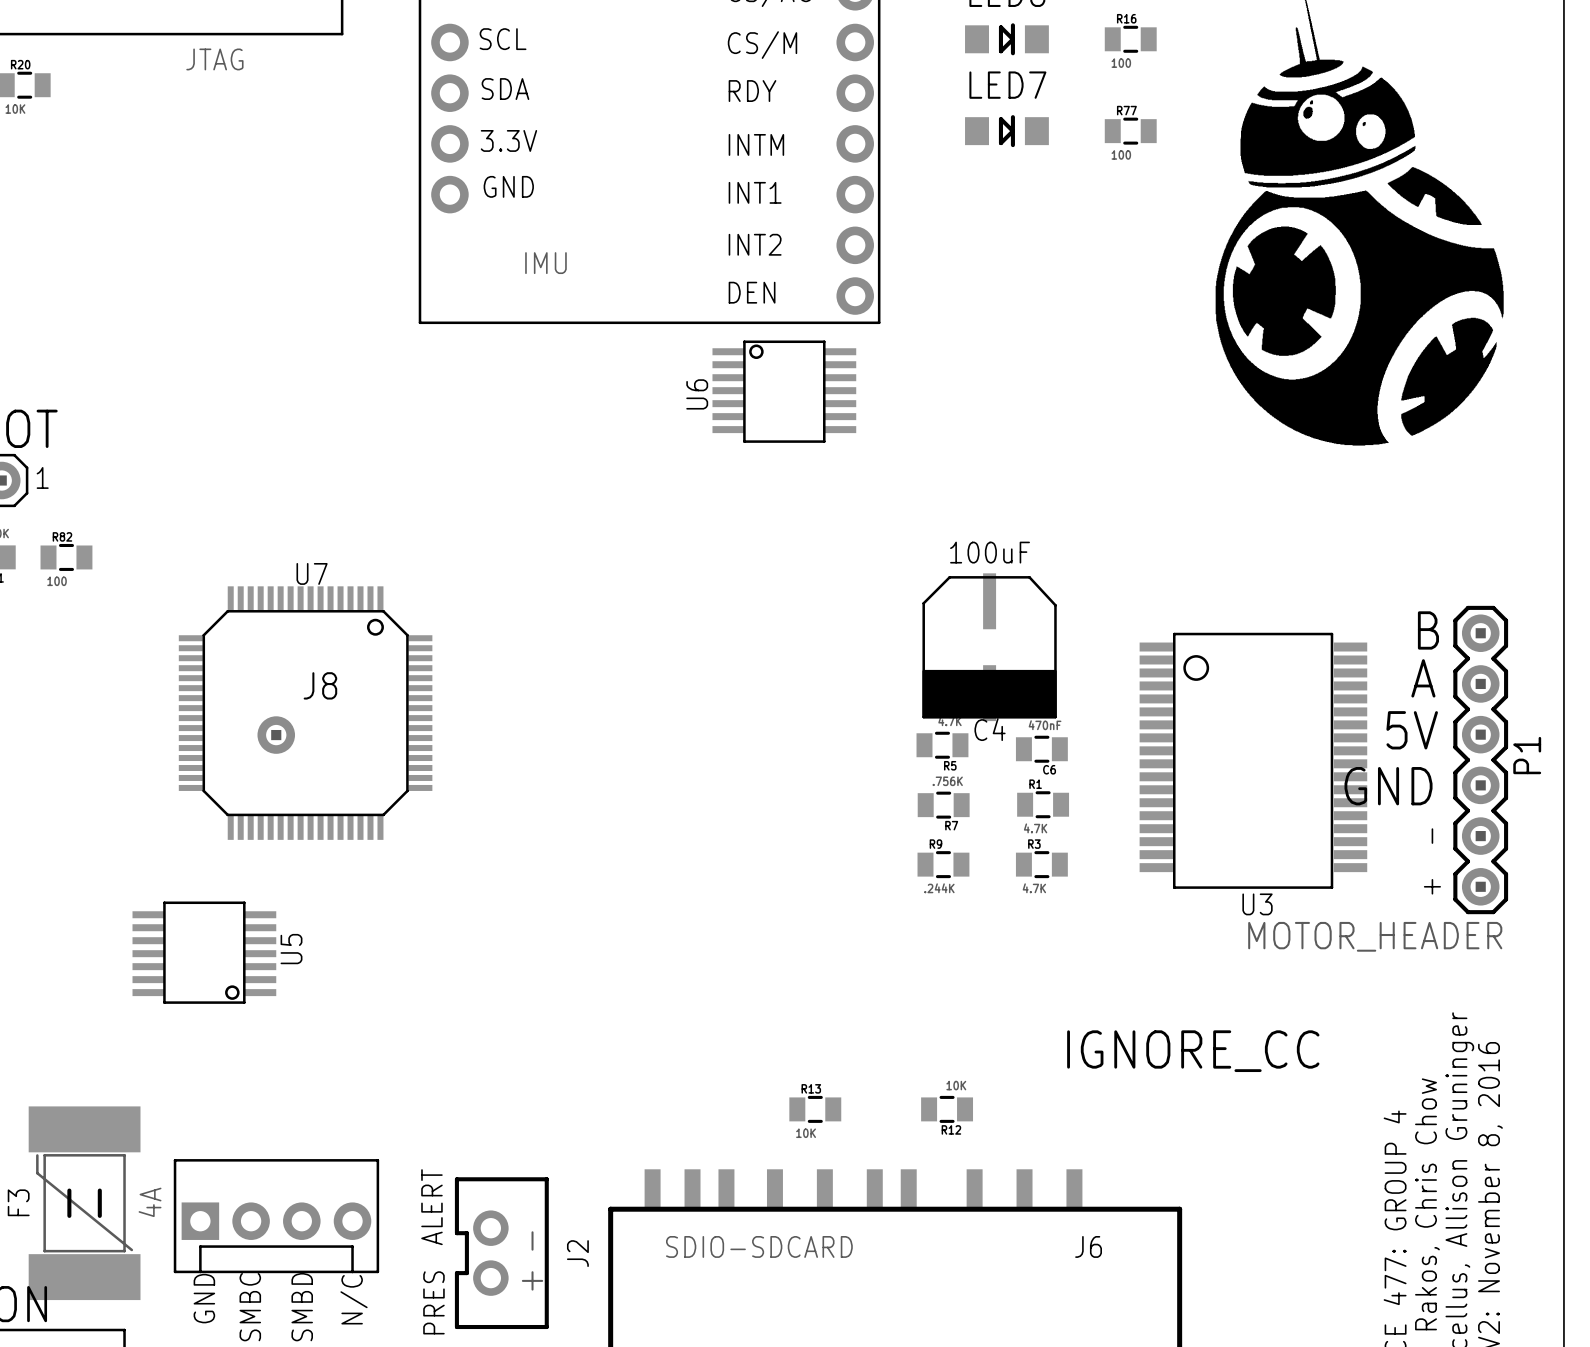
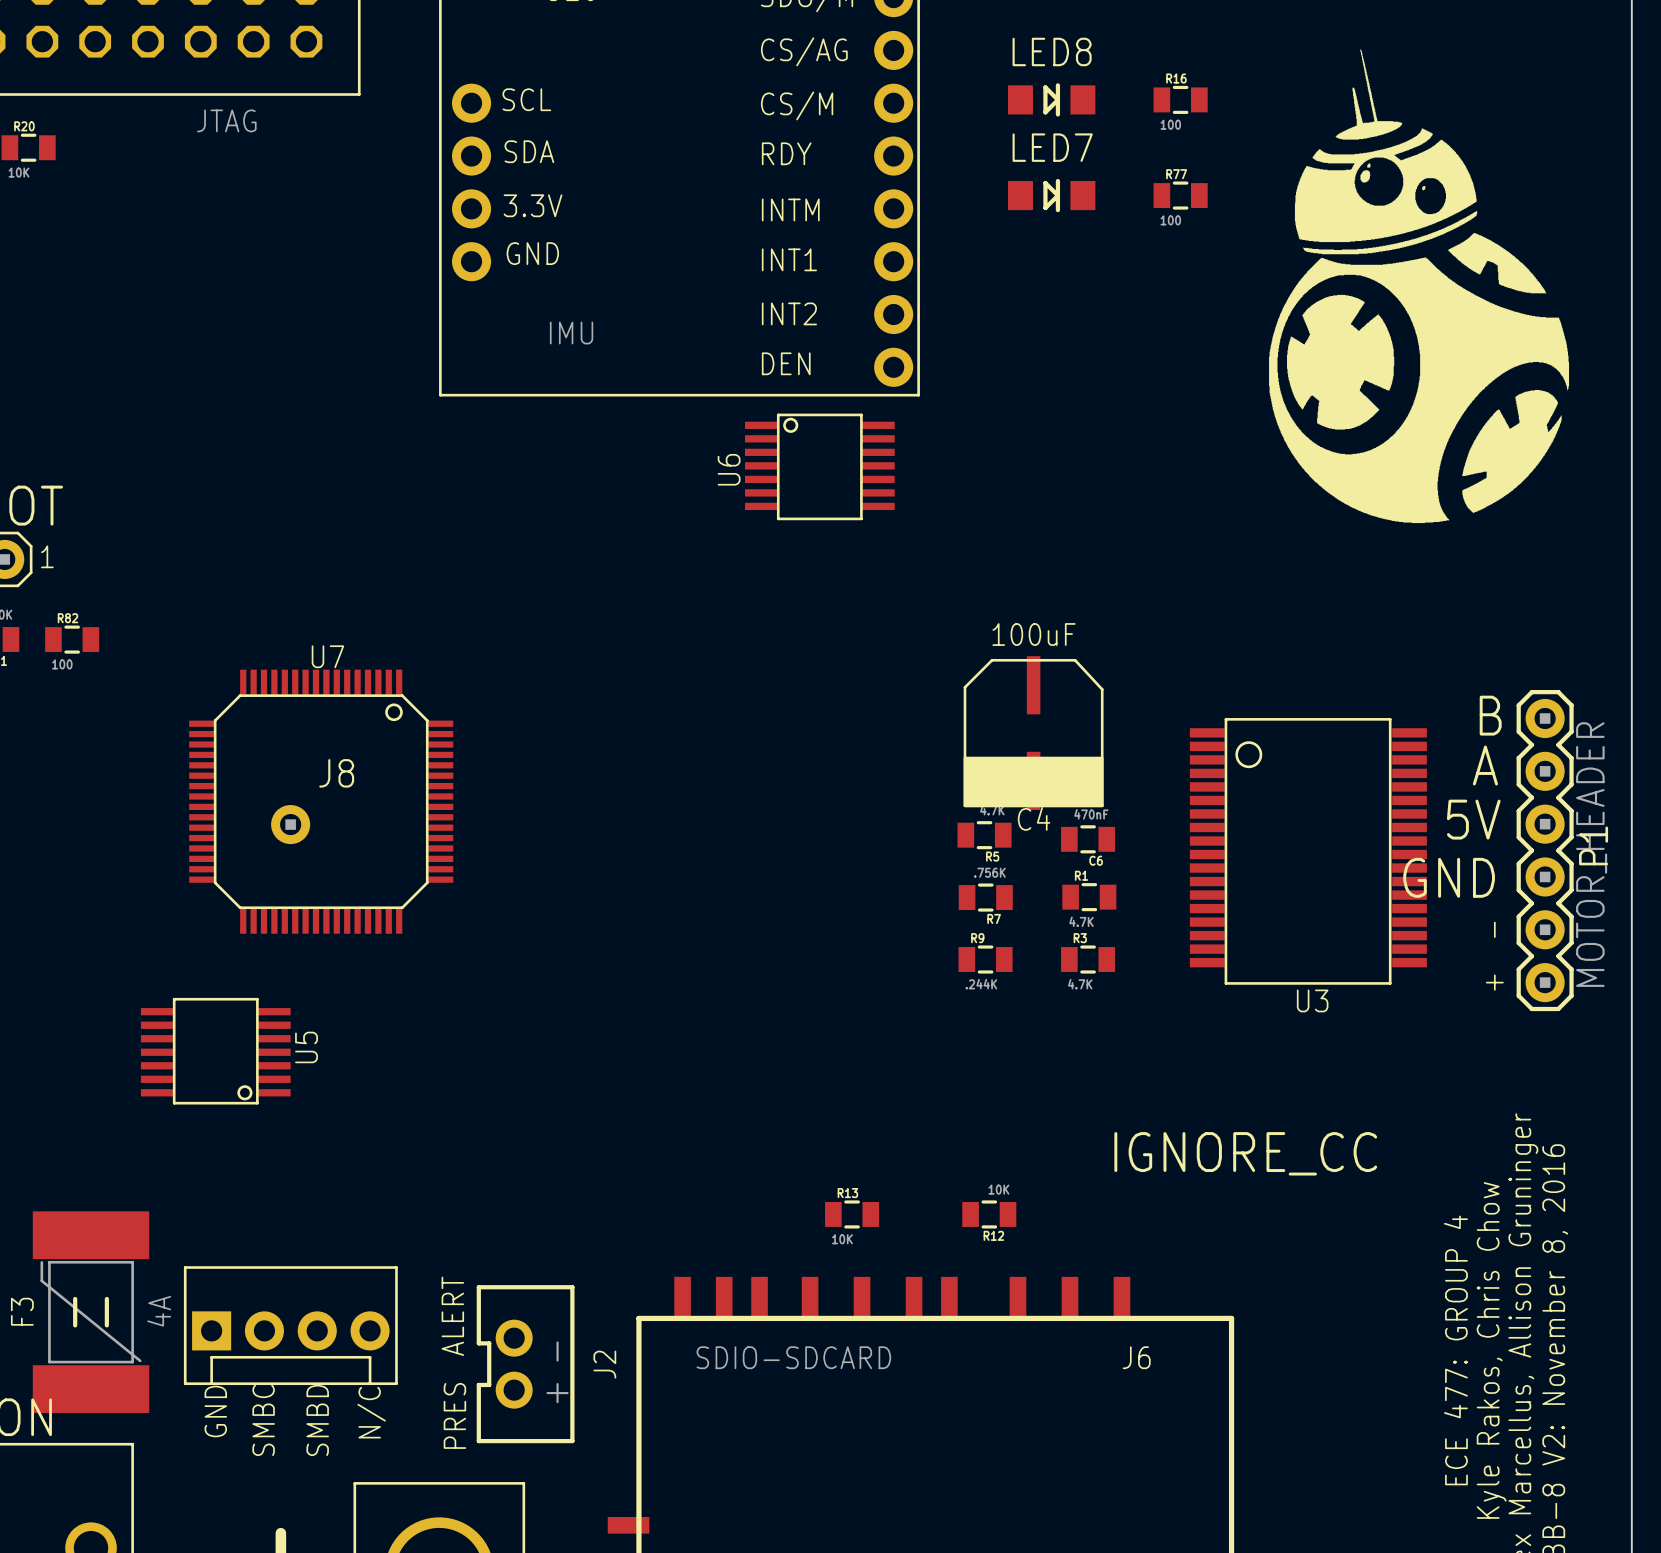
P1 value rotation: 0° (1375, 936) -> 90° counterclockwise (1591, 854)

